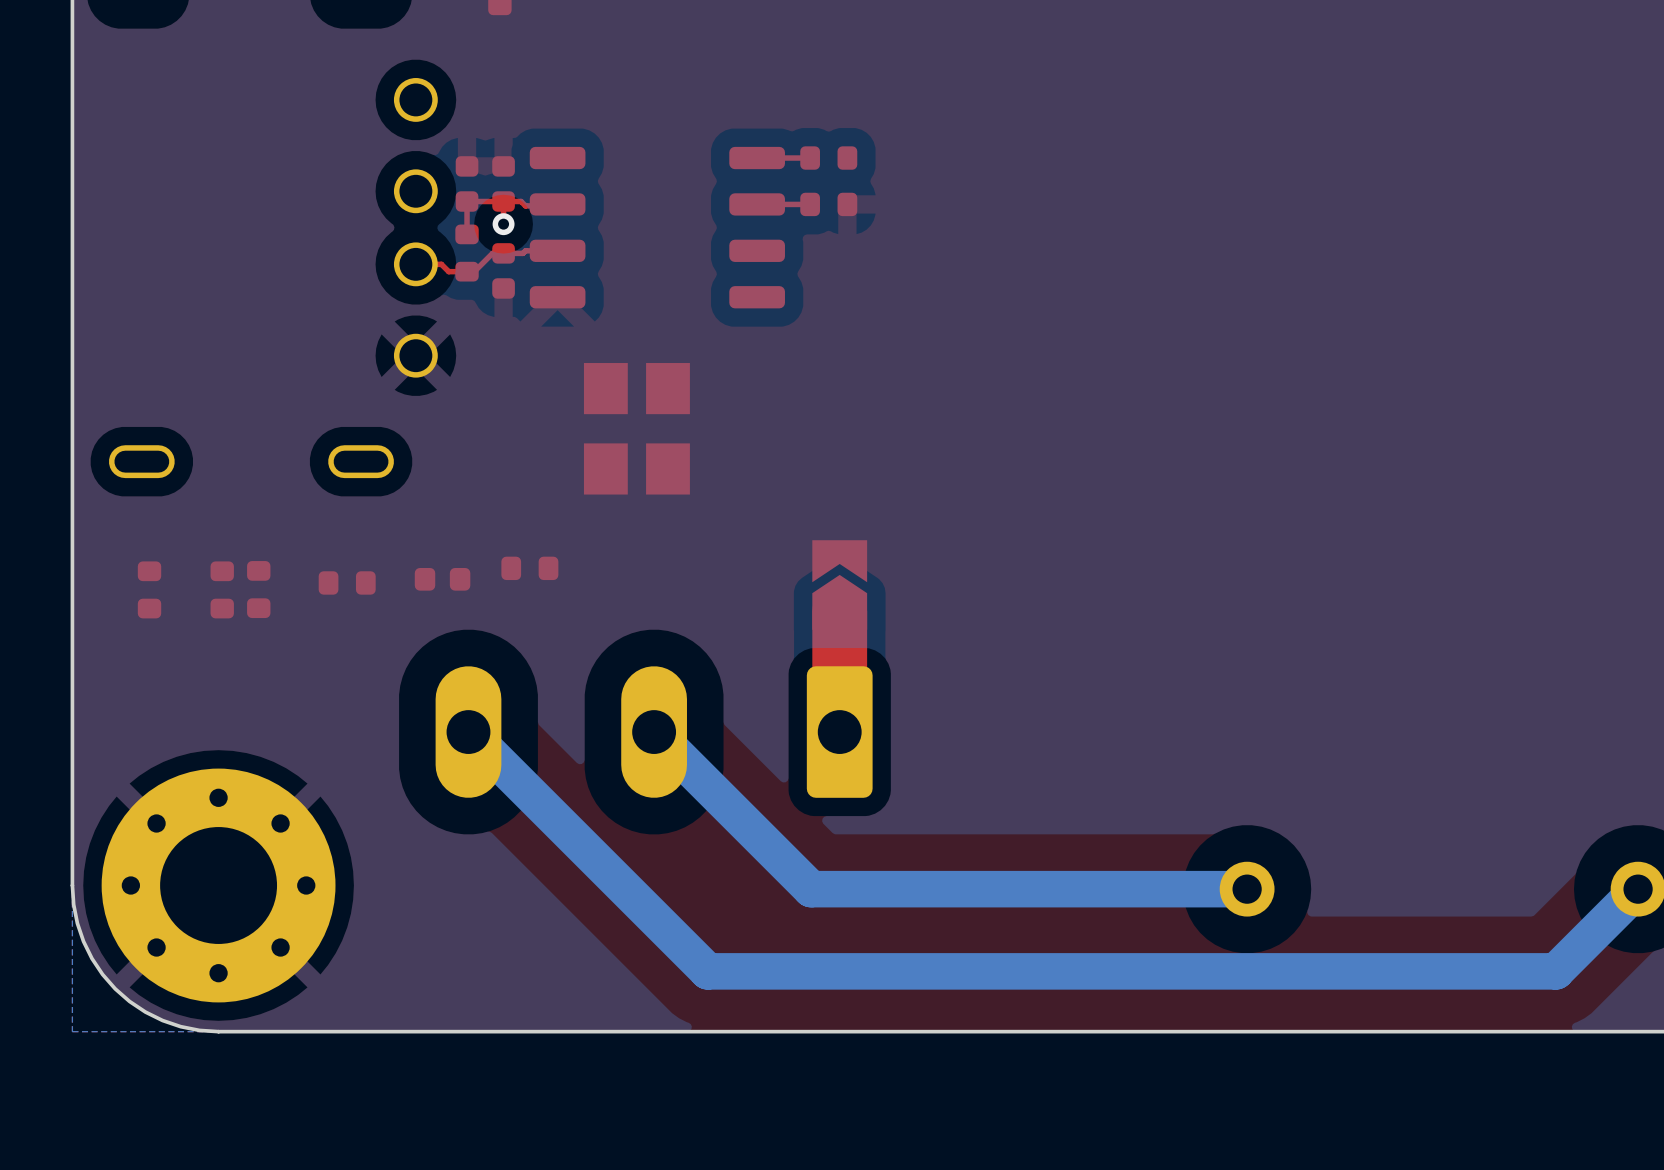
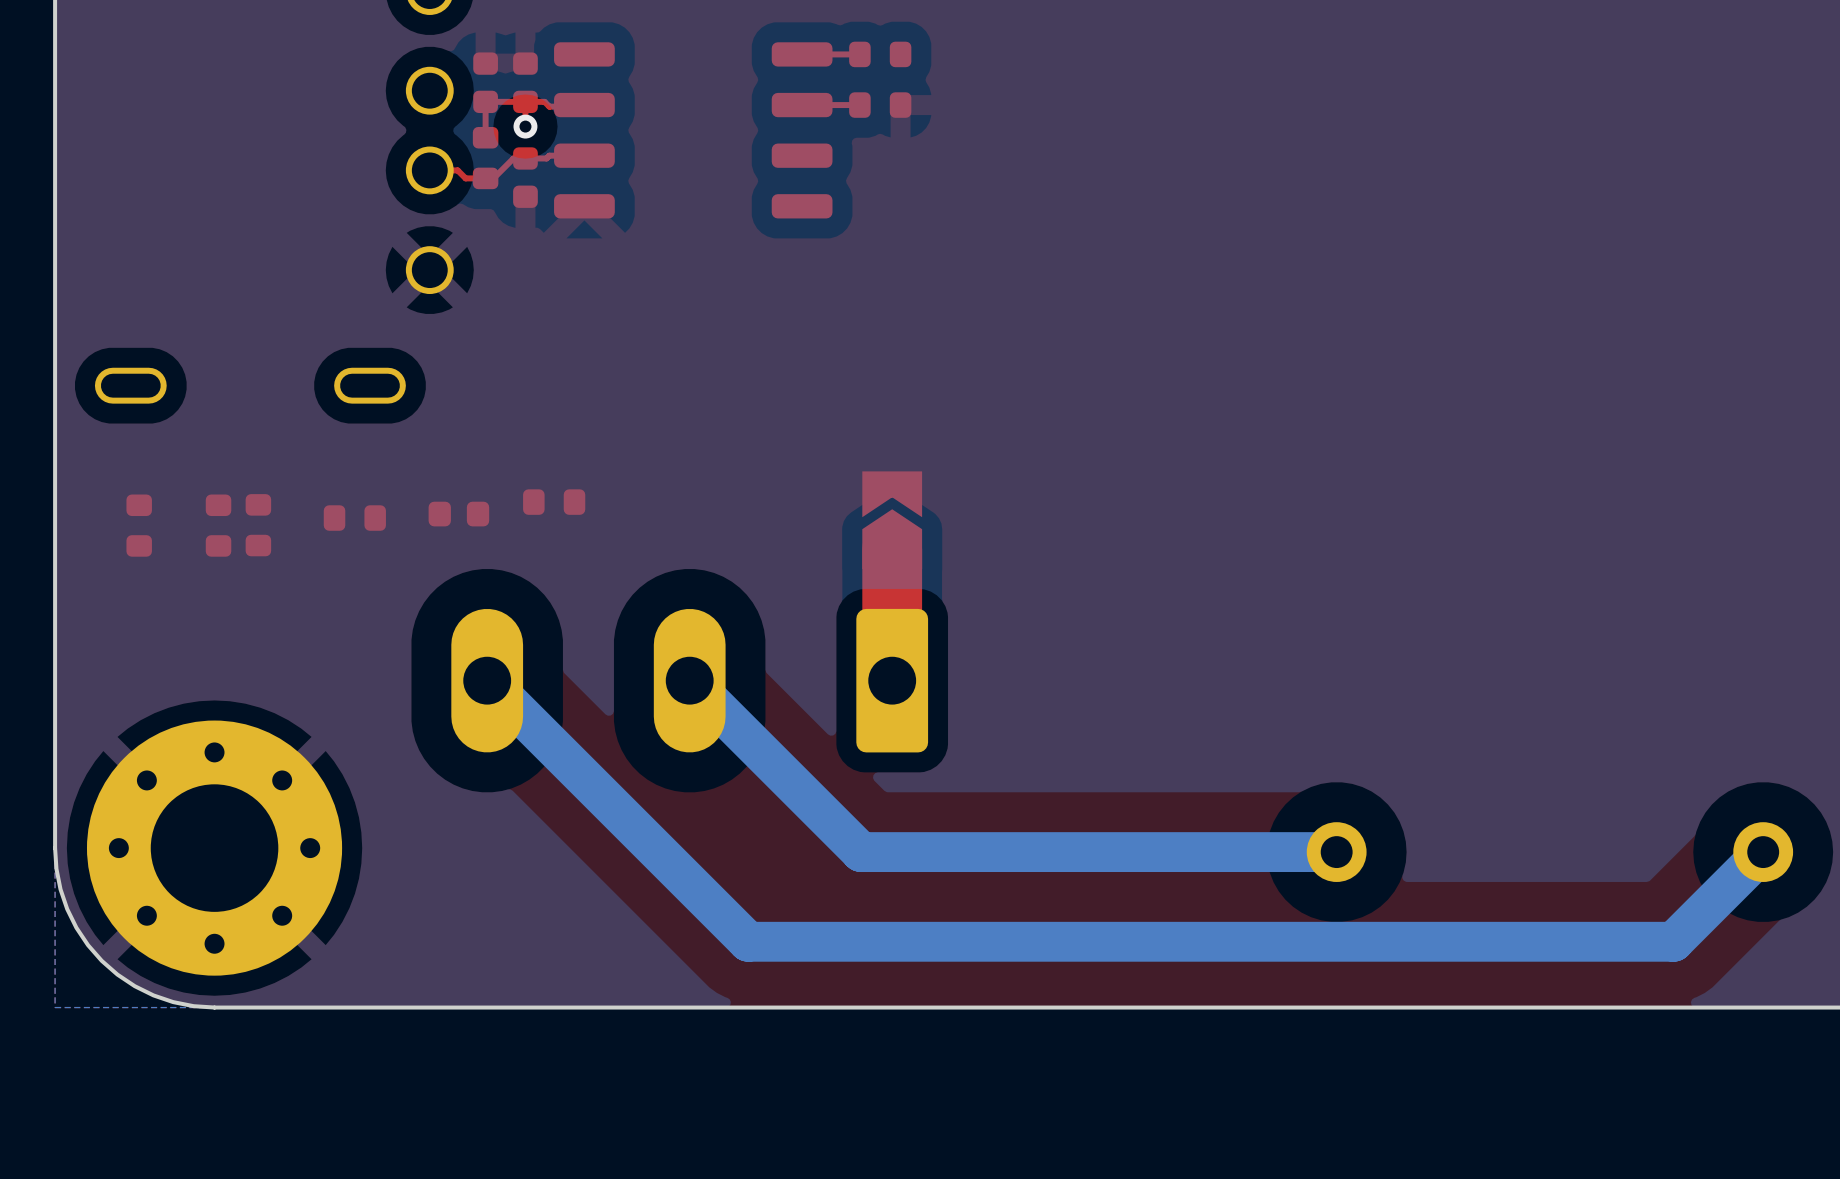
part: (636, 428) -> none

